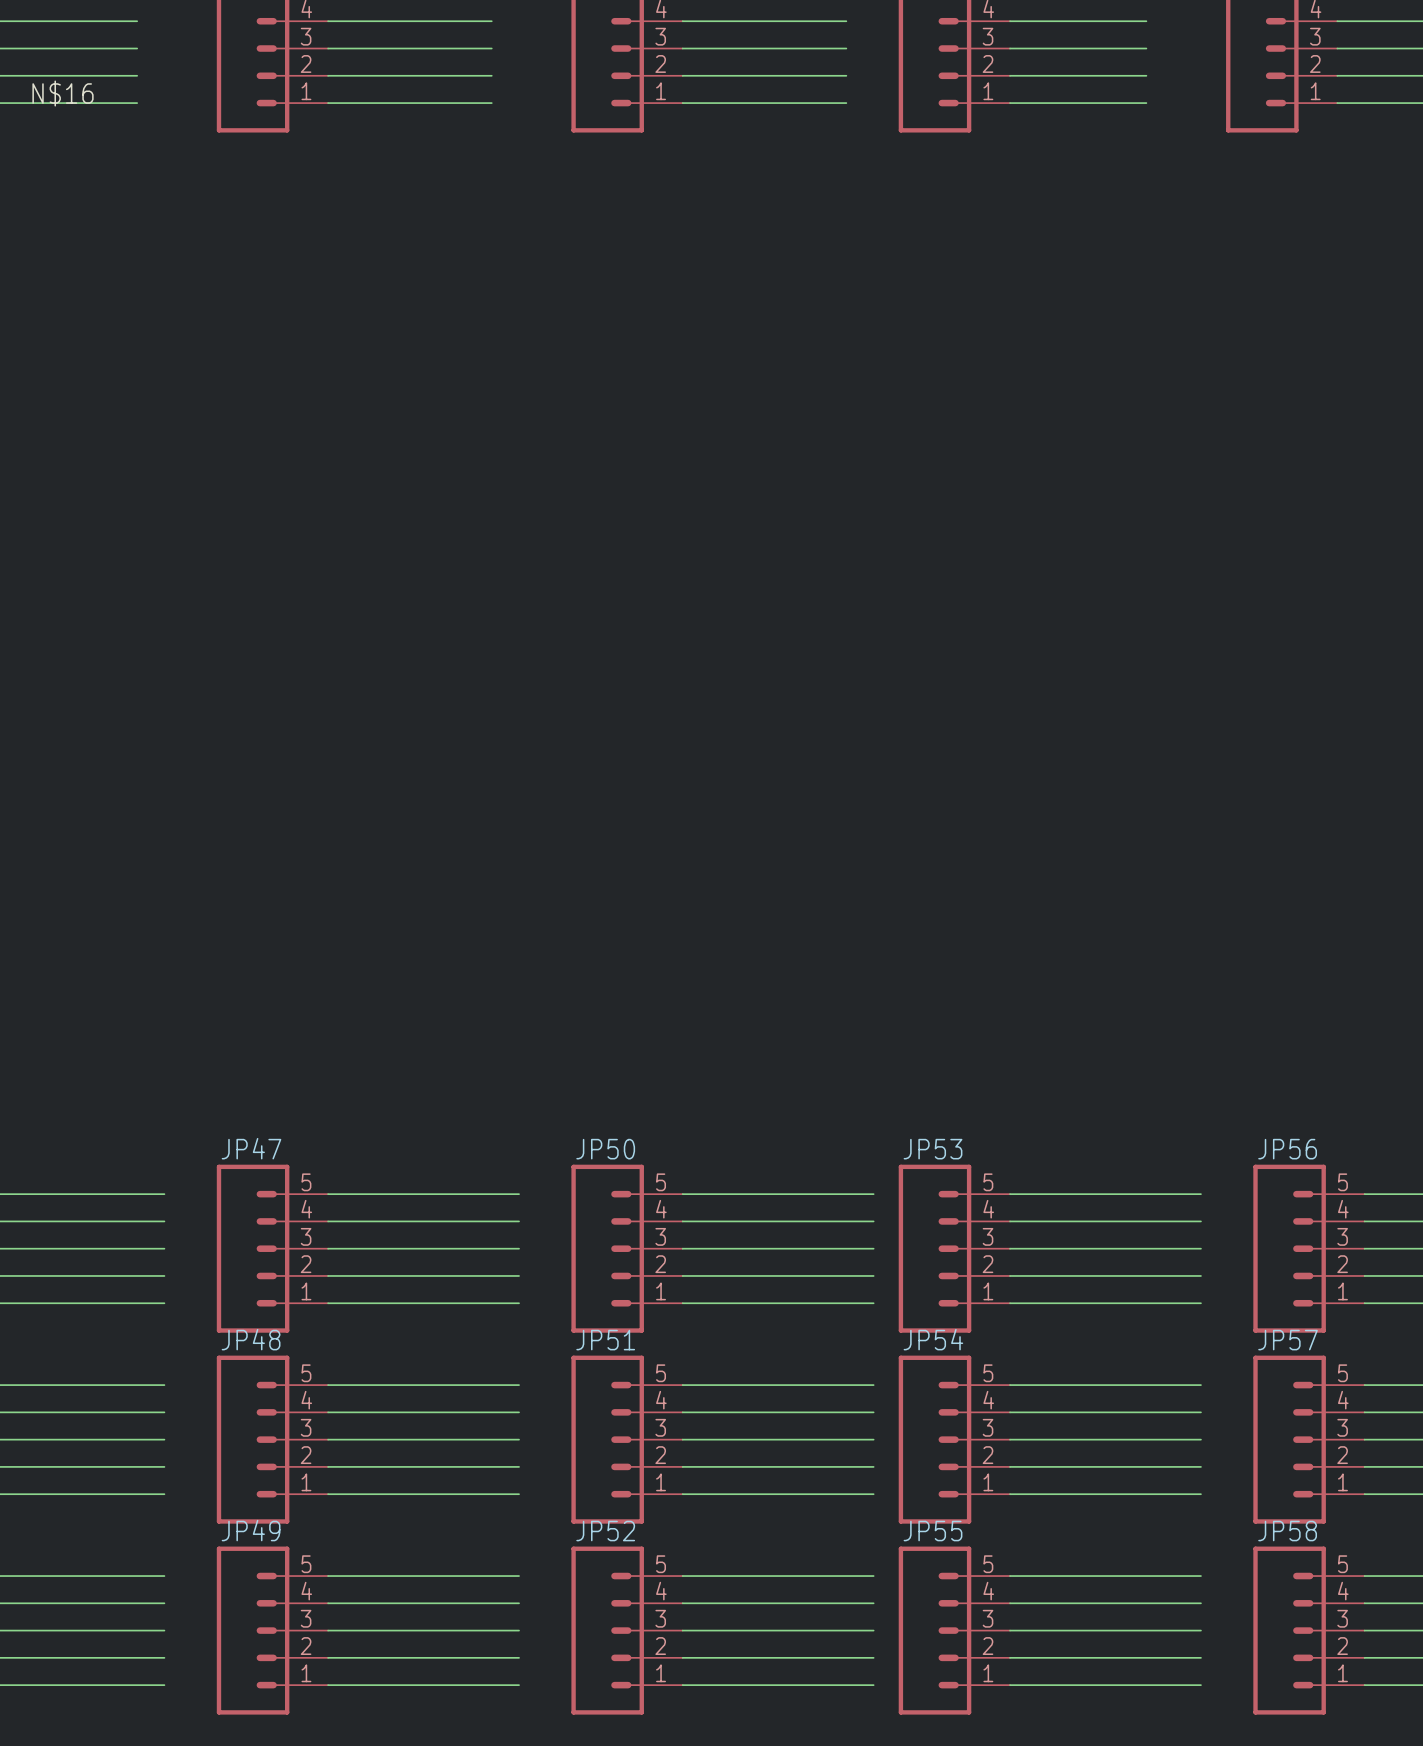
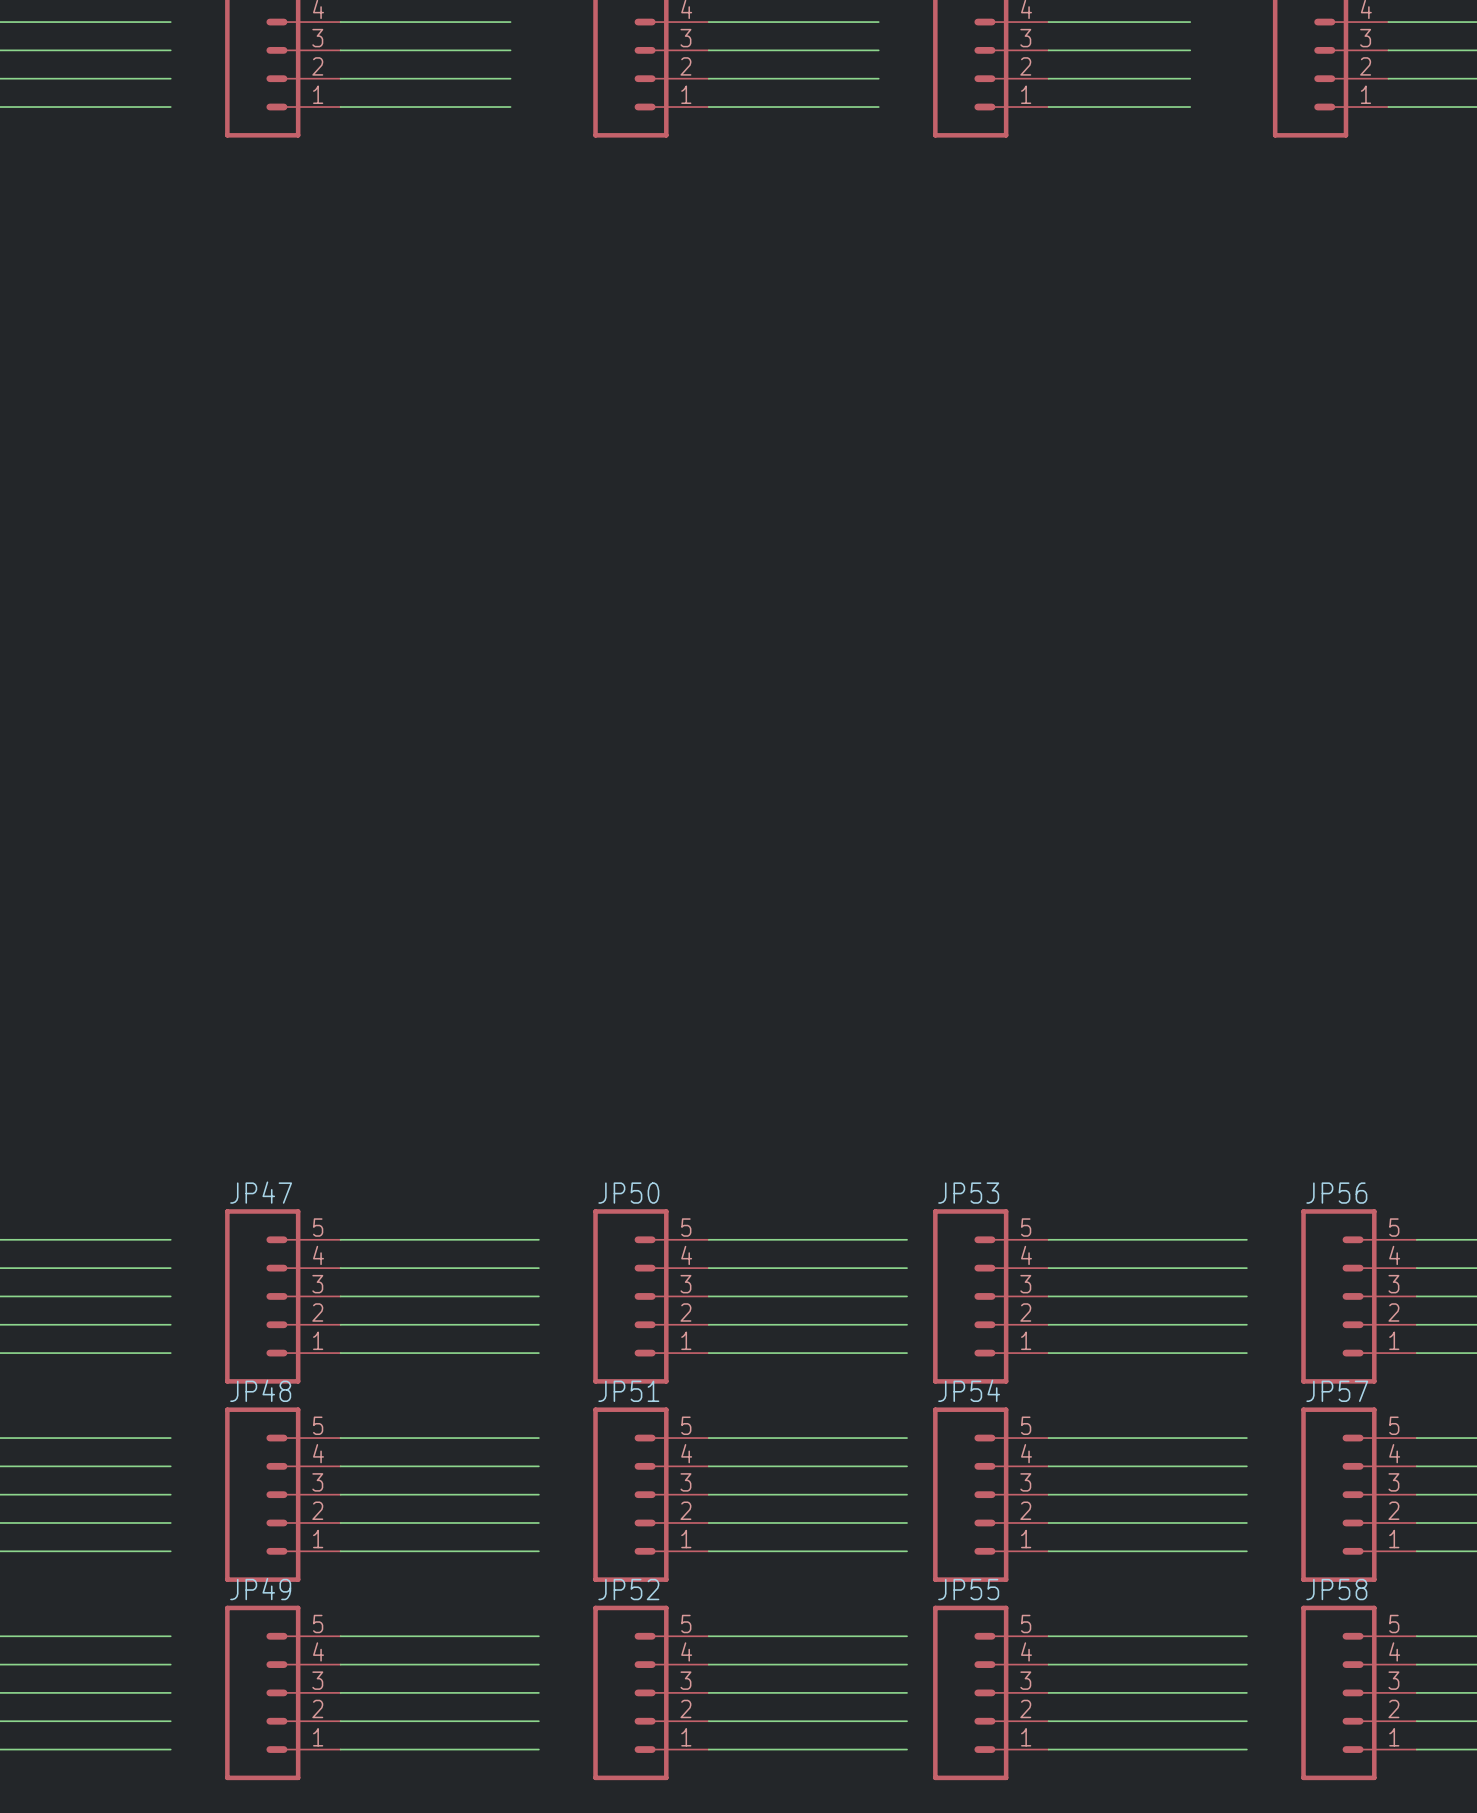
wire: none -> (142, 22) (170, 22)
wire: none -> (142, 50) (170, 50)
wire: none -> (142, 78) (170, 78)
label: N$16 (63, 93) -> none
wire: none -> (142, 107) (170, 107)

